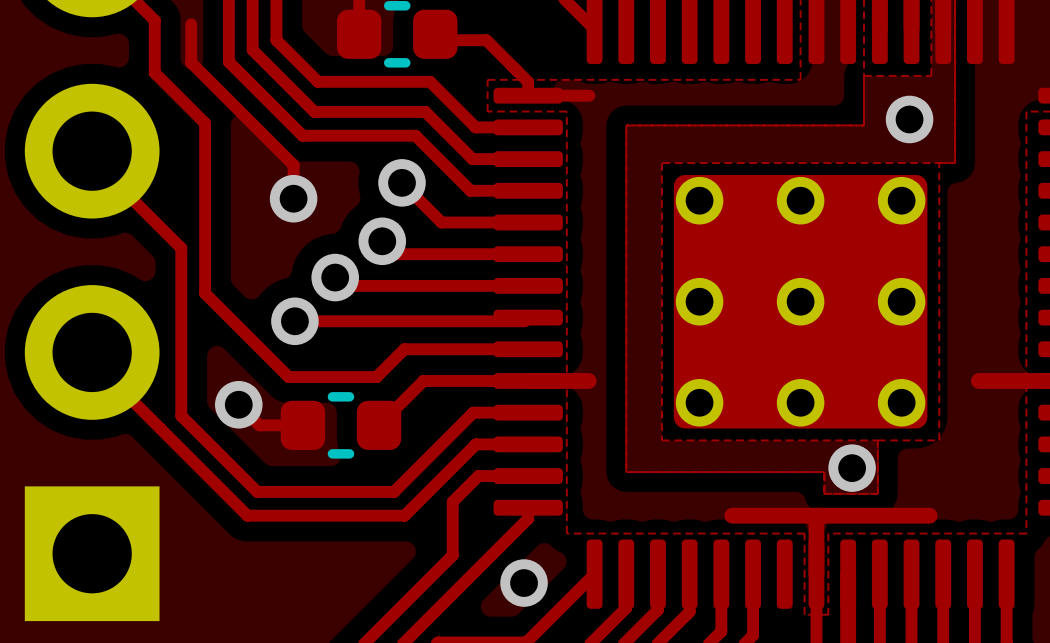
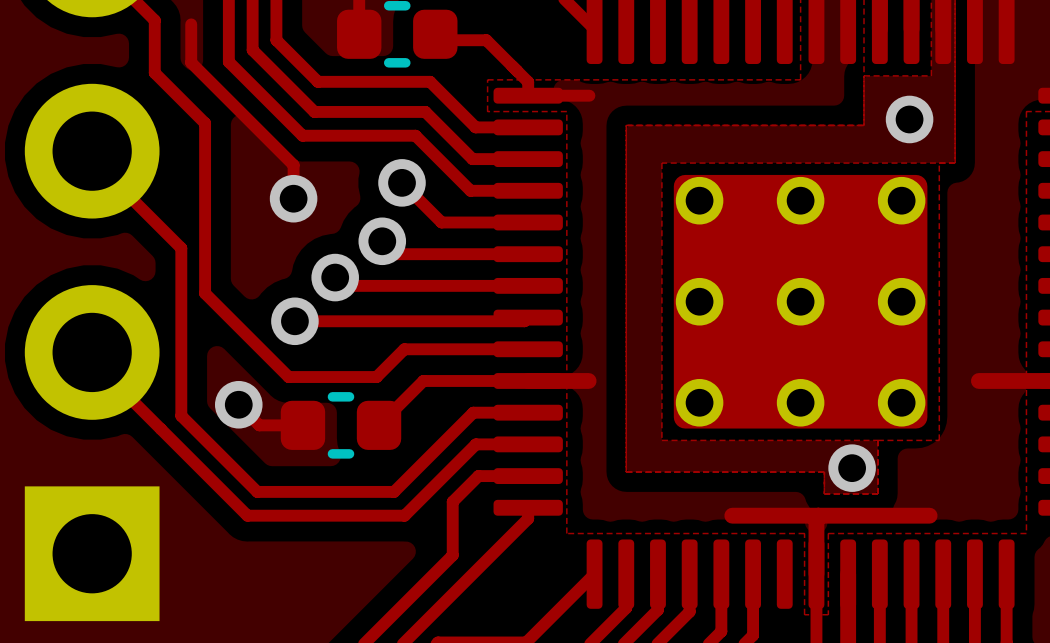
via: (524, 583) -> none

